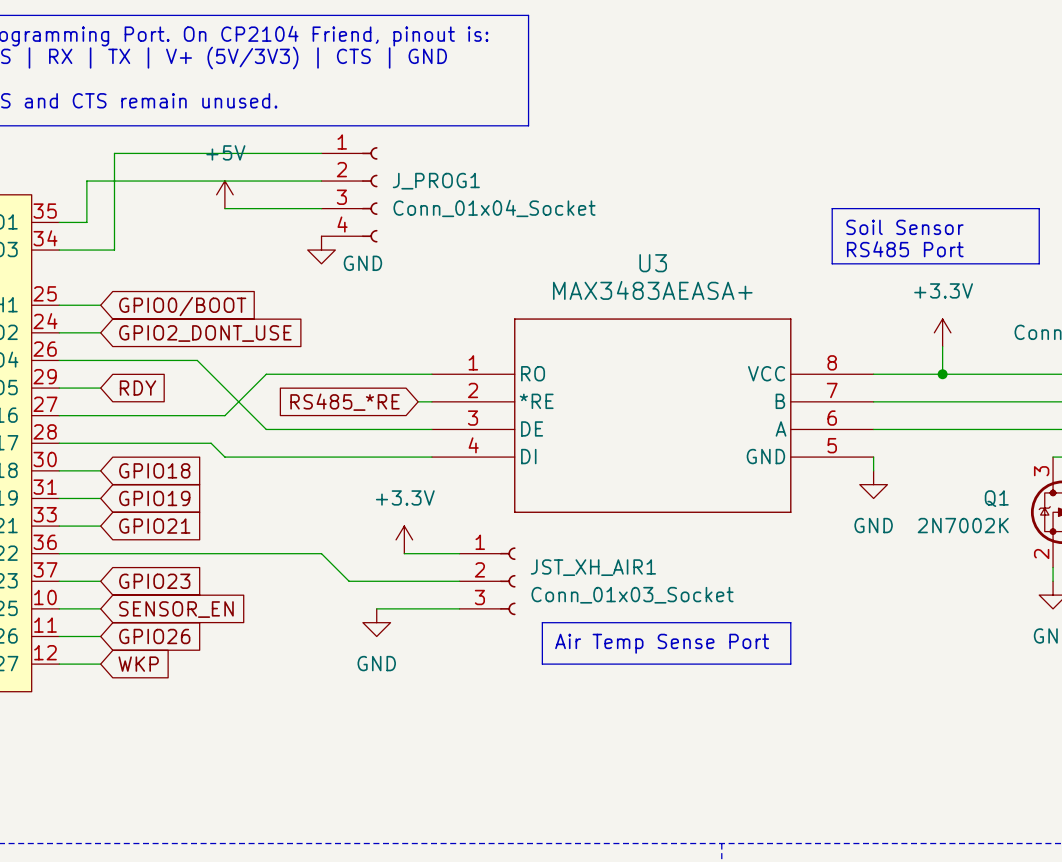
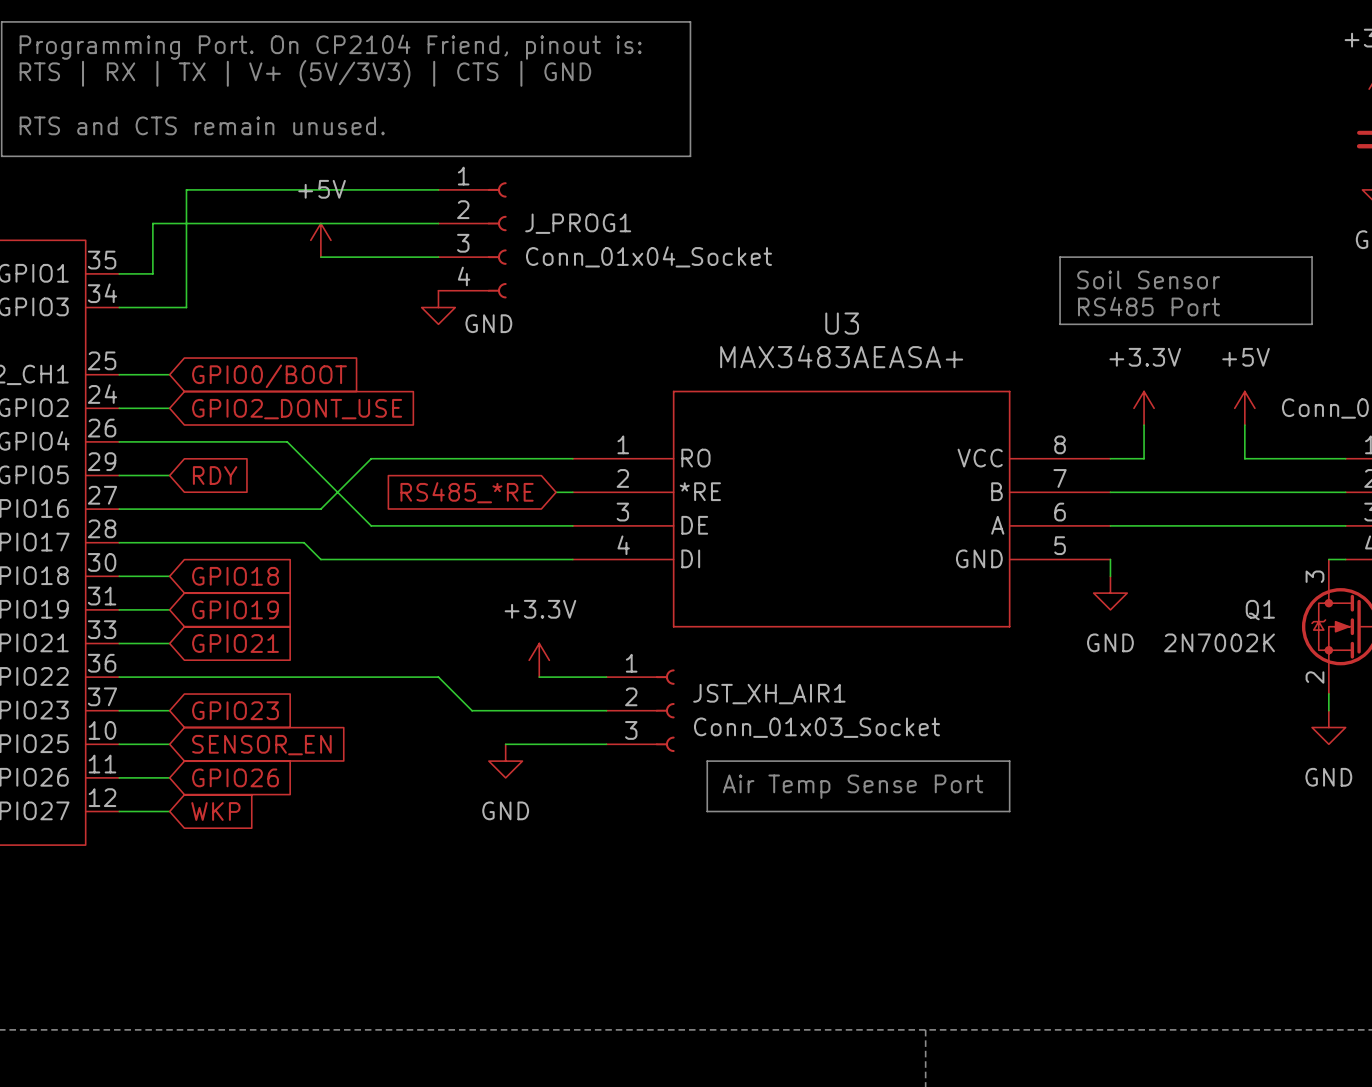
power symbol position: +3.3V (942, 332) -> +3.3V (1144, 408)
power symbol: none -> +5V (1244, 408)
wire: (942, 346) (942, 374) -> (1244, 425) (1244, 458)
wire: (901, 374) (984, 374) -> (1144, 458) (1144, 425)
junction: (942, 374) -> none

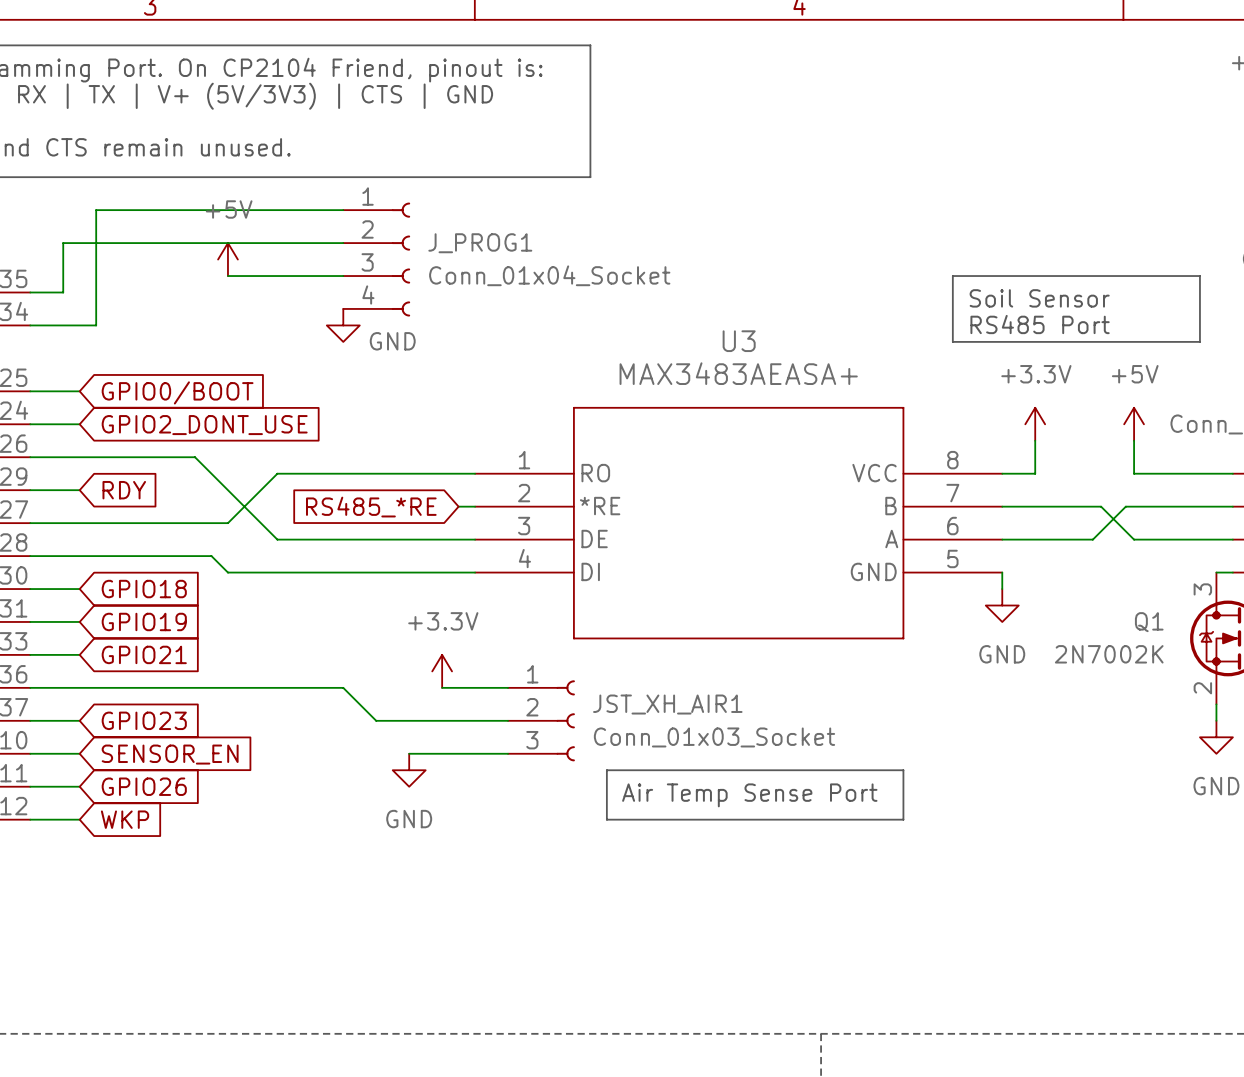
wire: (1211, 492) (1236, 492) -> (1101, 506) (1134, 539)
wire: (1202, 525) (1244, 525) -> (1092, 539) (1125, 506)

